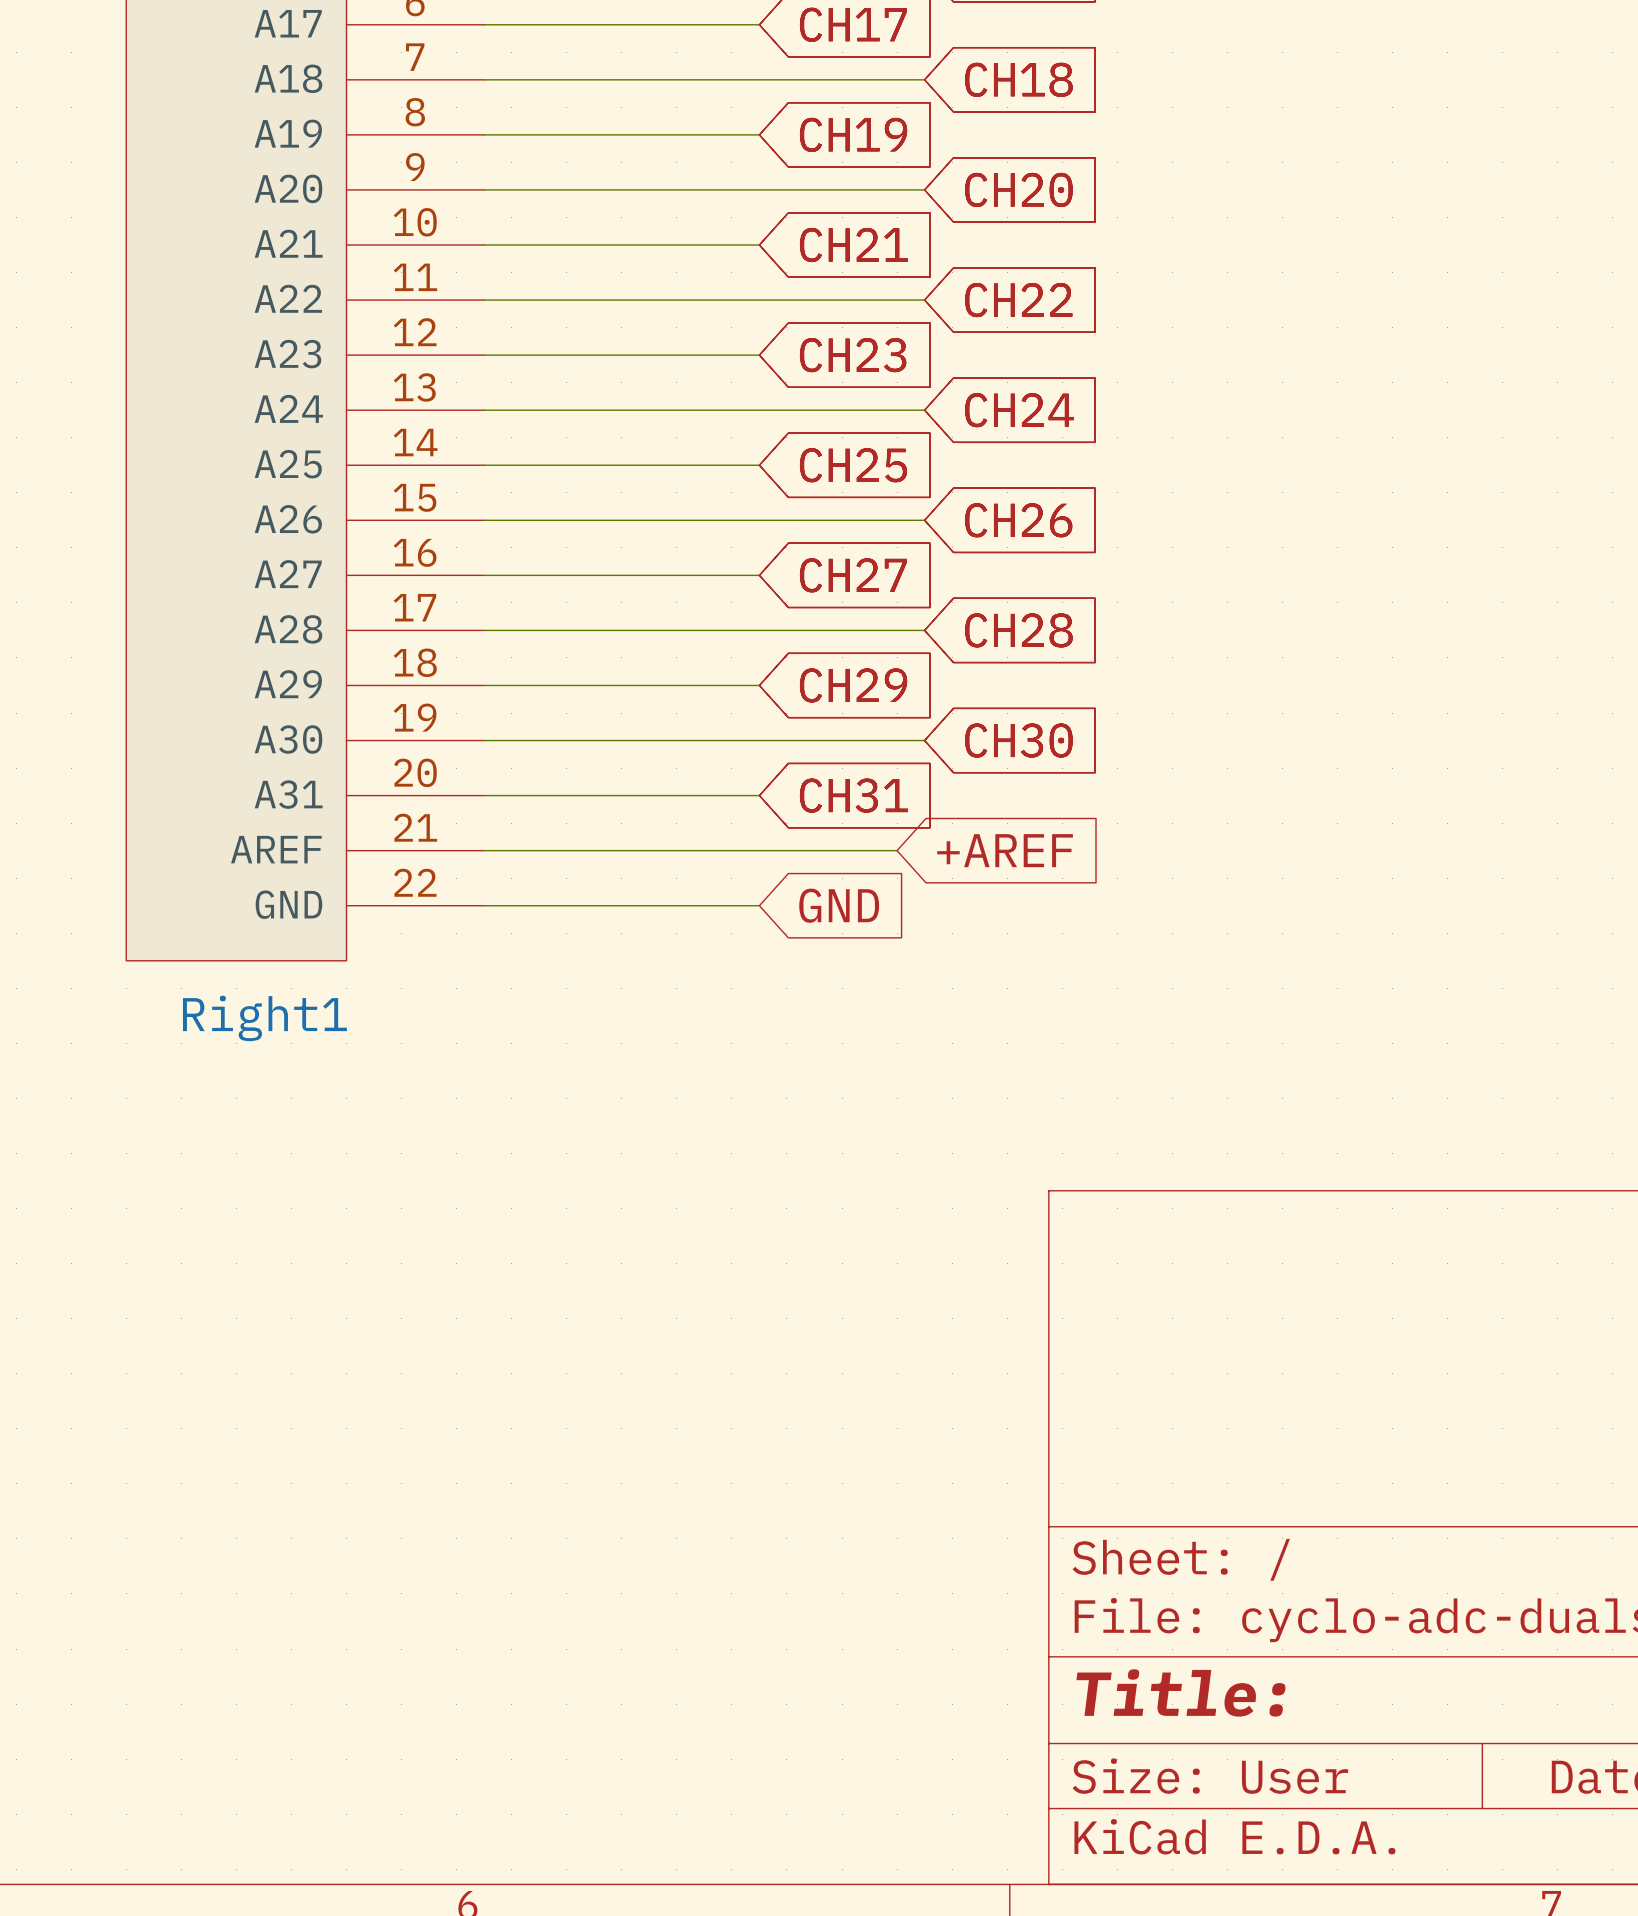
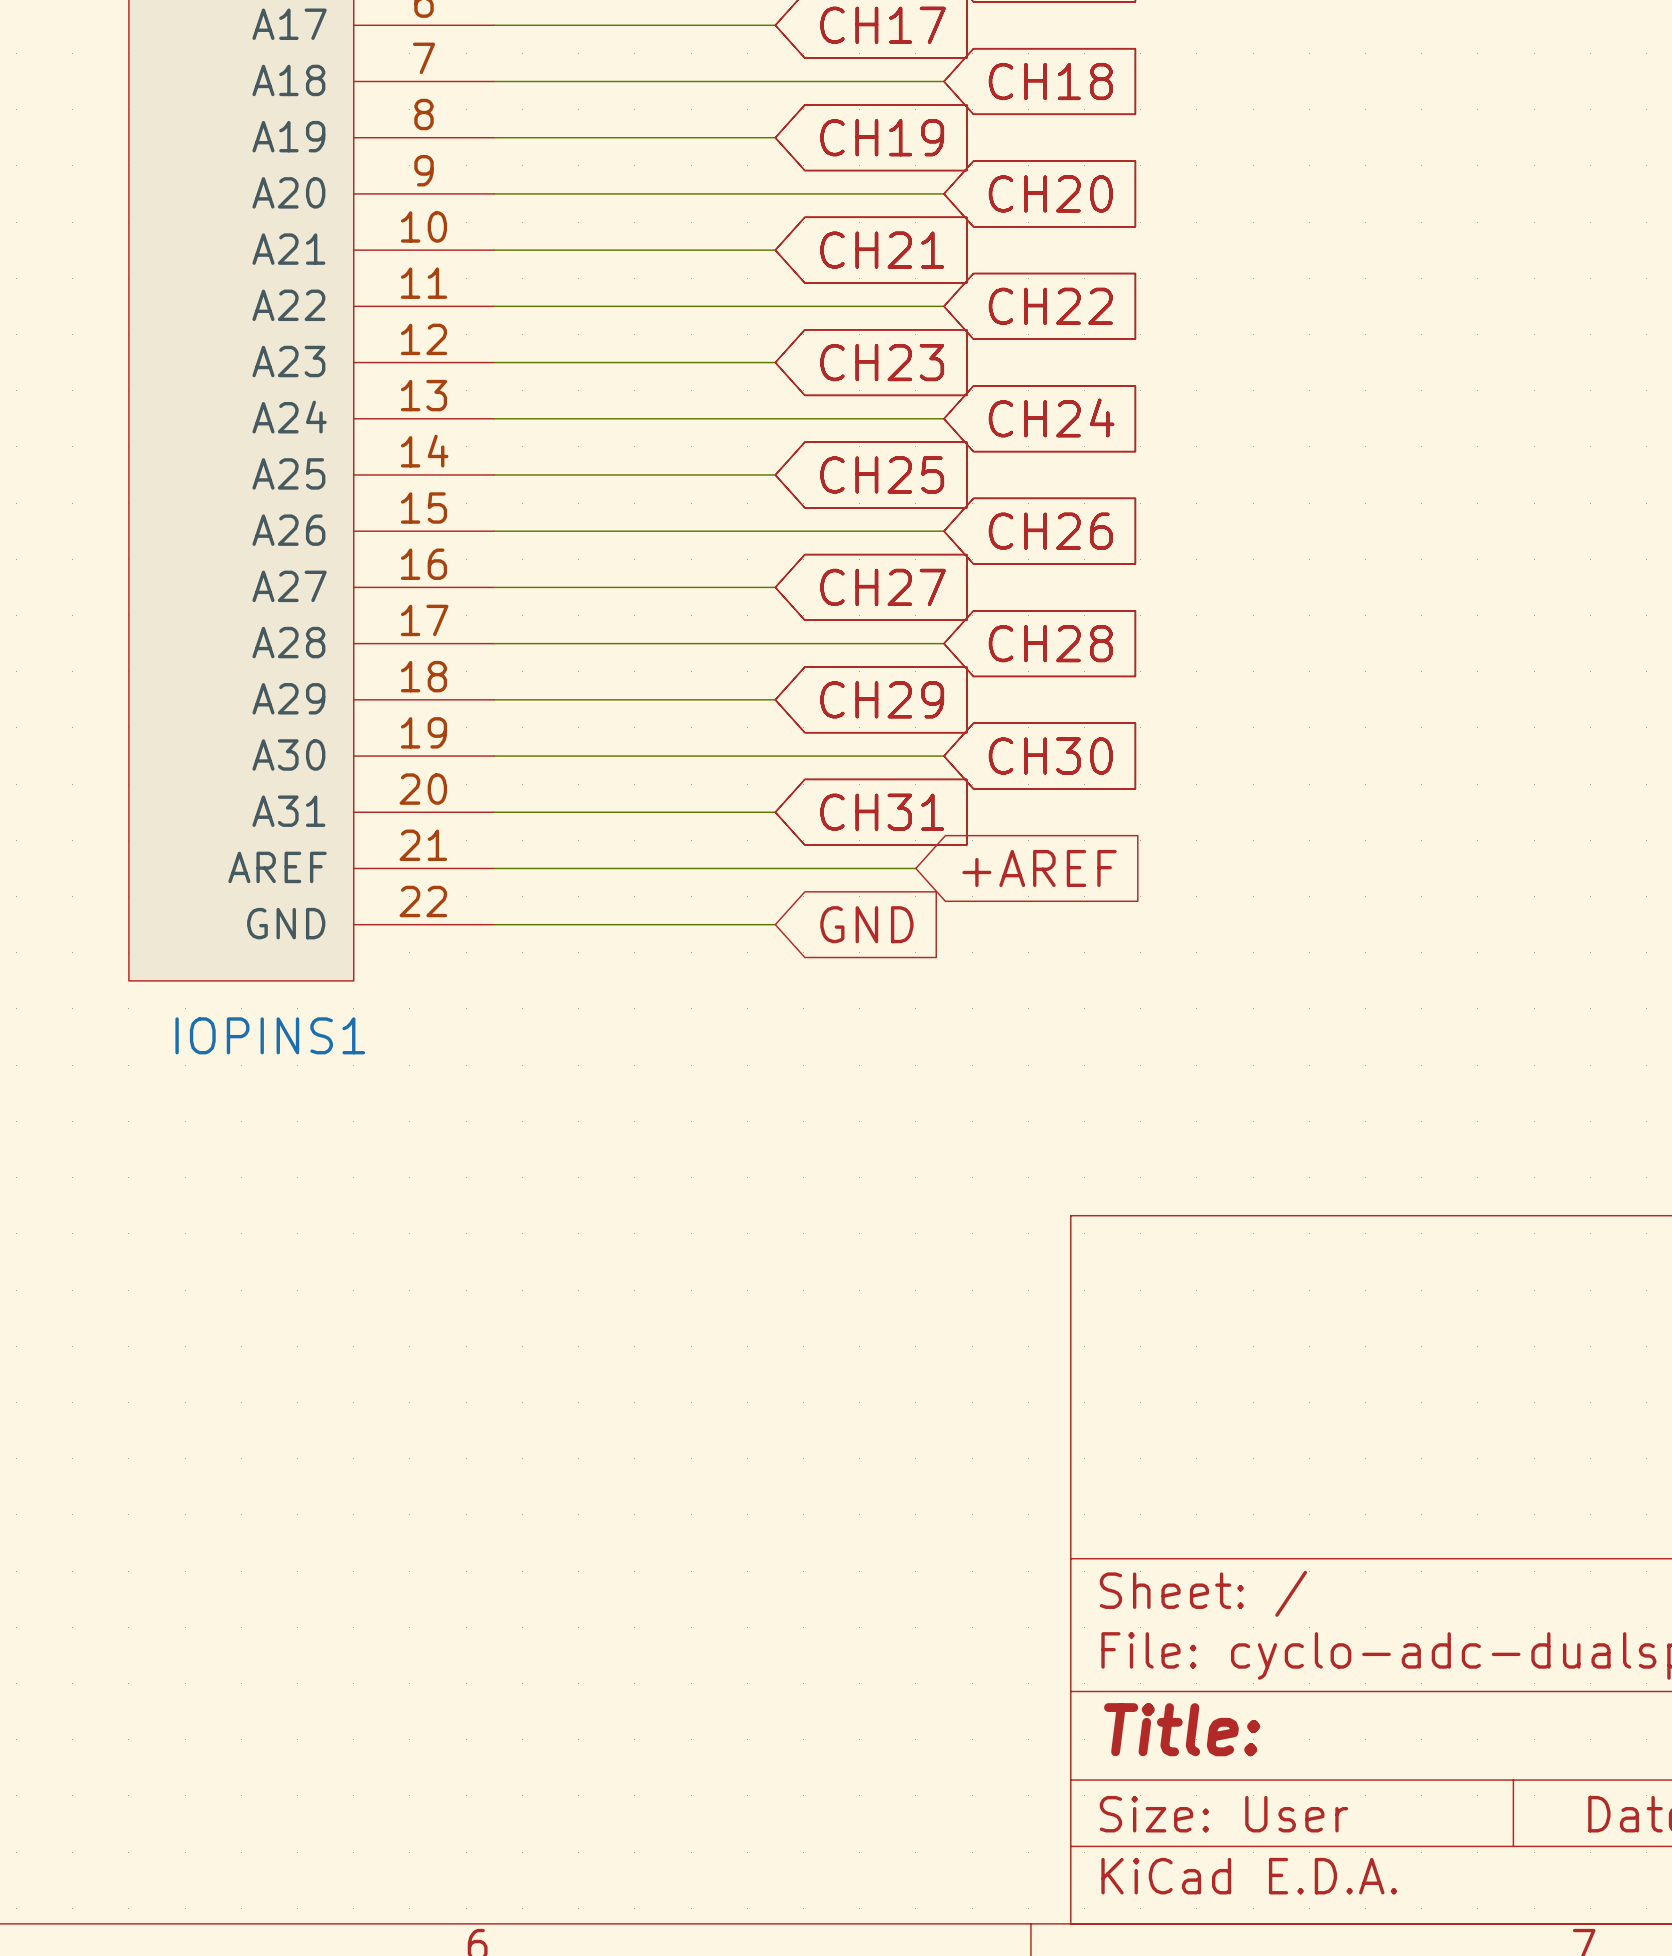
Right1 name: Right1 (264, 1018) -> IOPINS1 (270, 1035)

